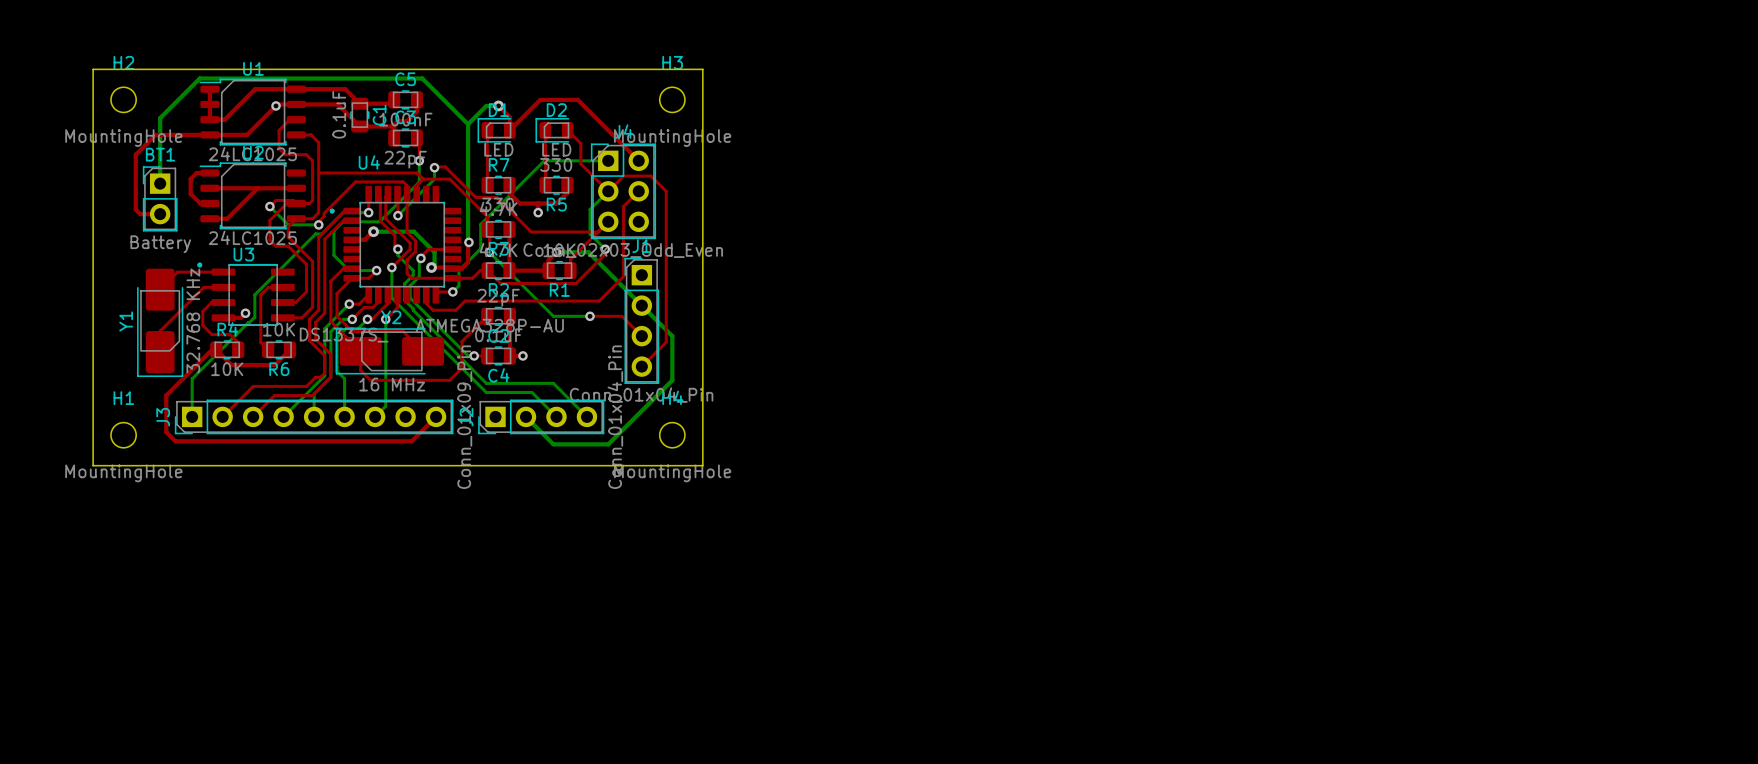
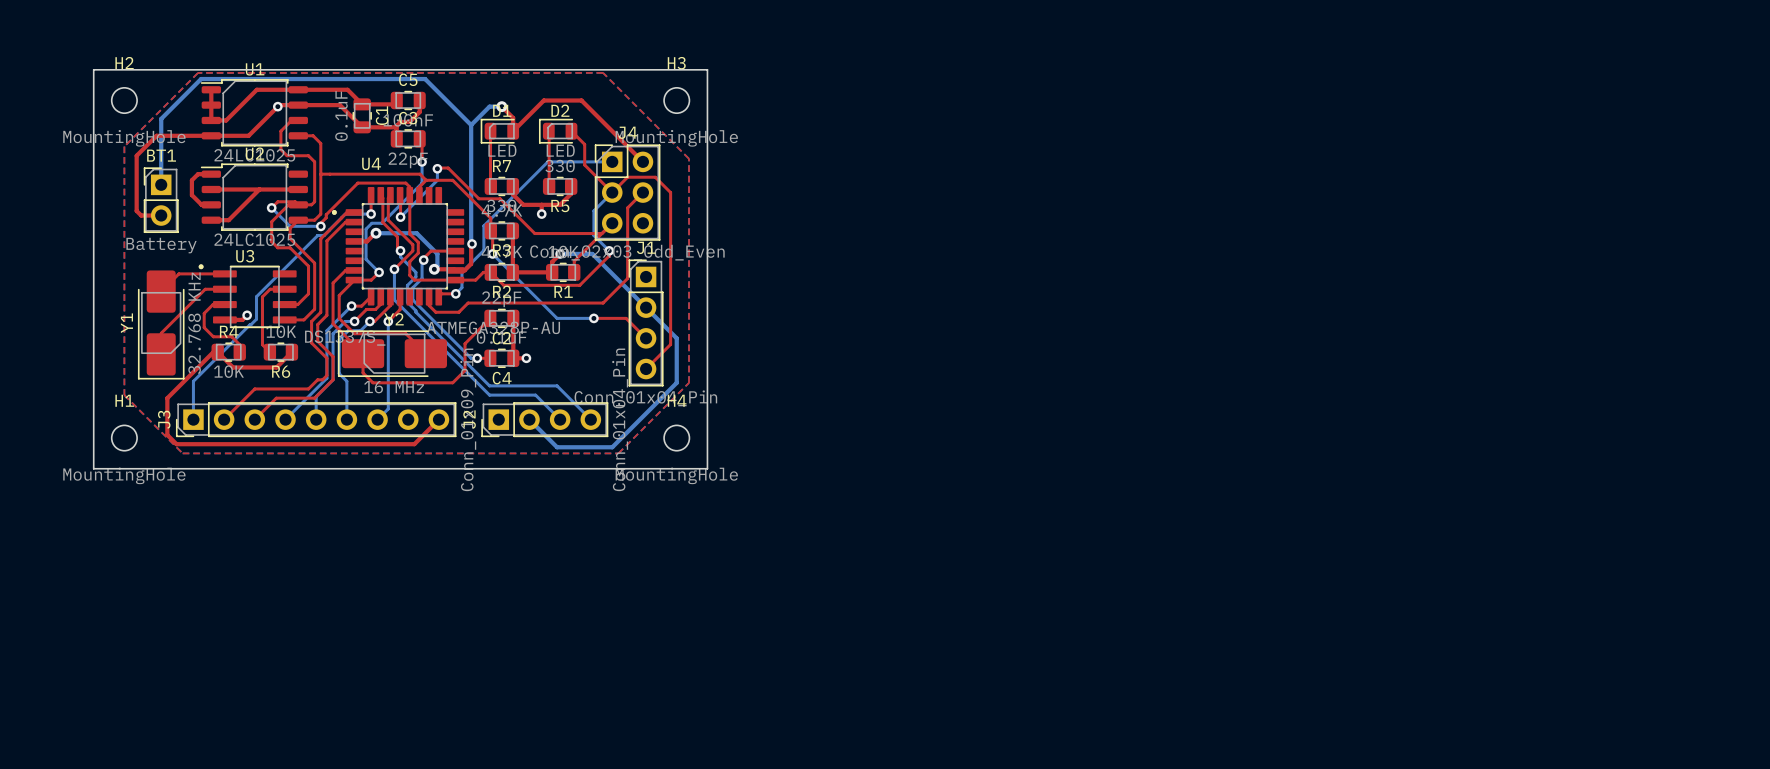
top zone outline: none -> (198, 72) (603, 72) (689, 158) (689, 382) (618, 453) (182, 453) (124, 395) (124, 146) (198, 72)
bottom track: (369, 221) (343, 221) (333, 230) (333, 255) (349, 270) (376, 270) -> (371, 223) (366, 229) (366, 259) (379, 272)

